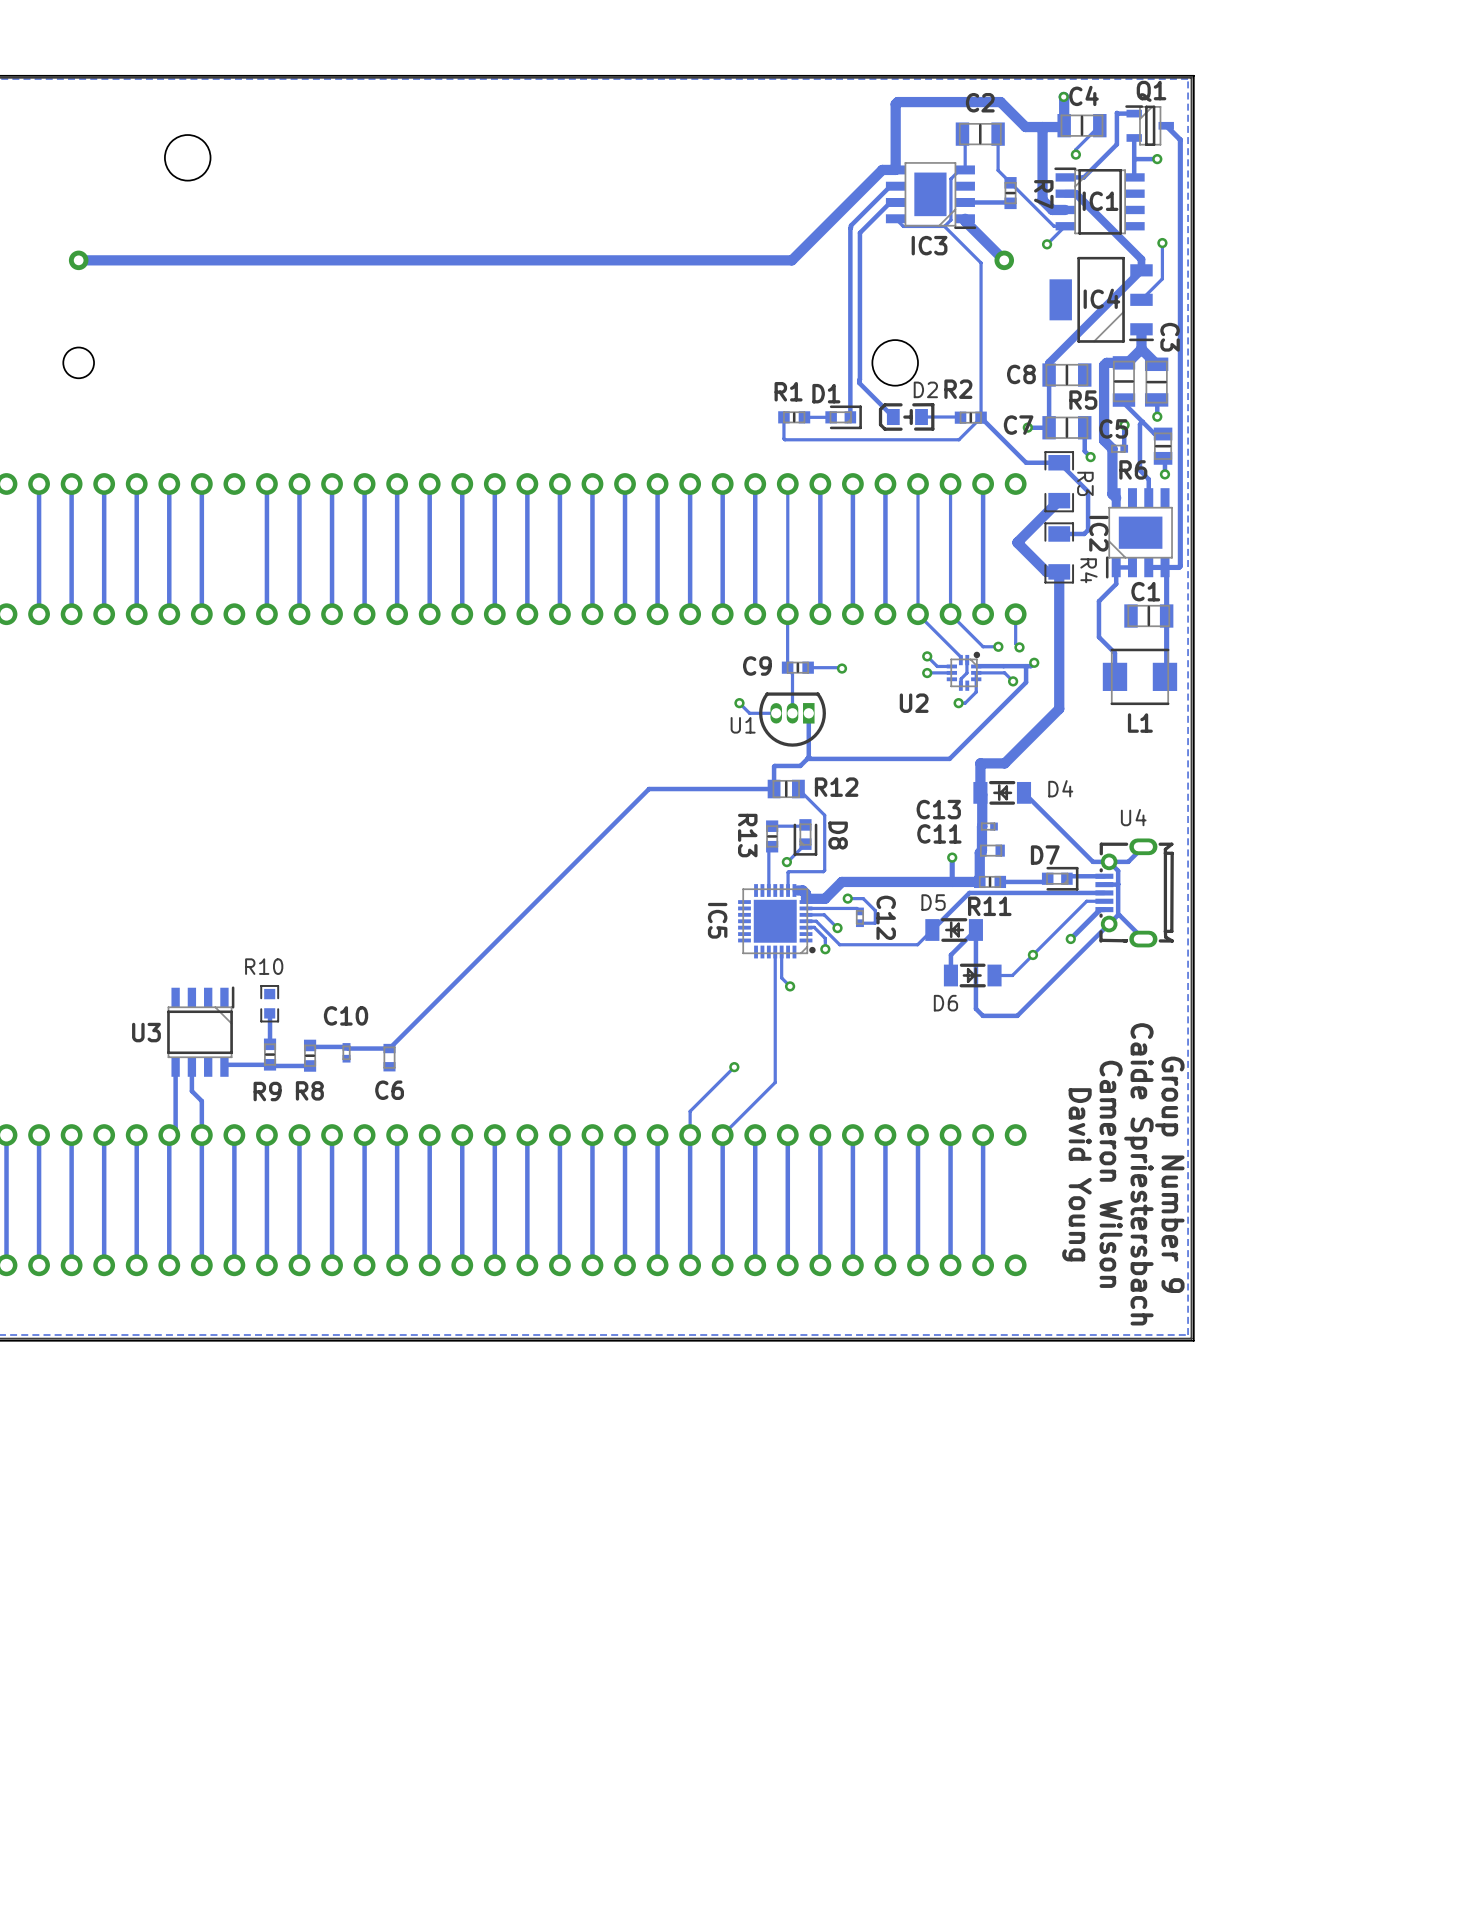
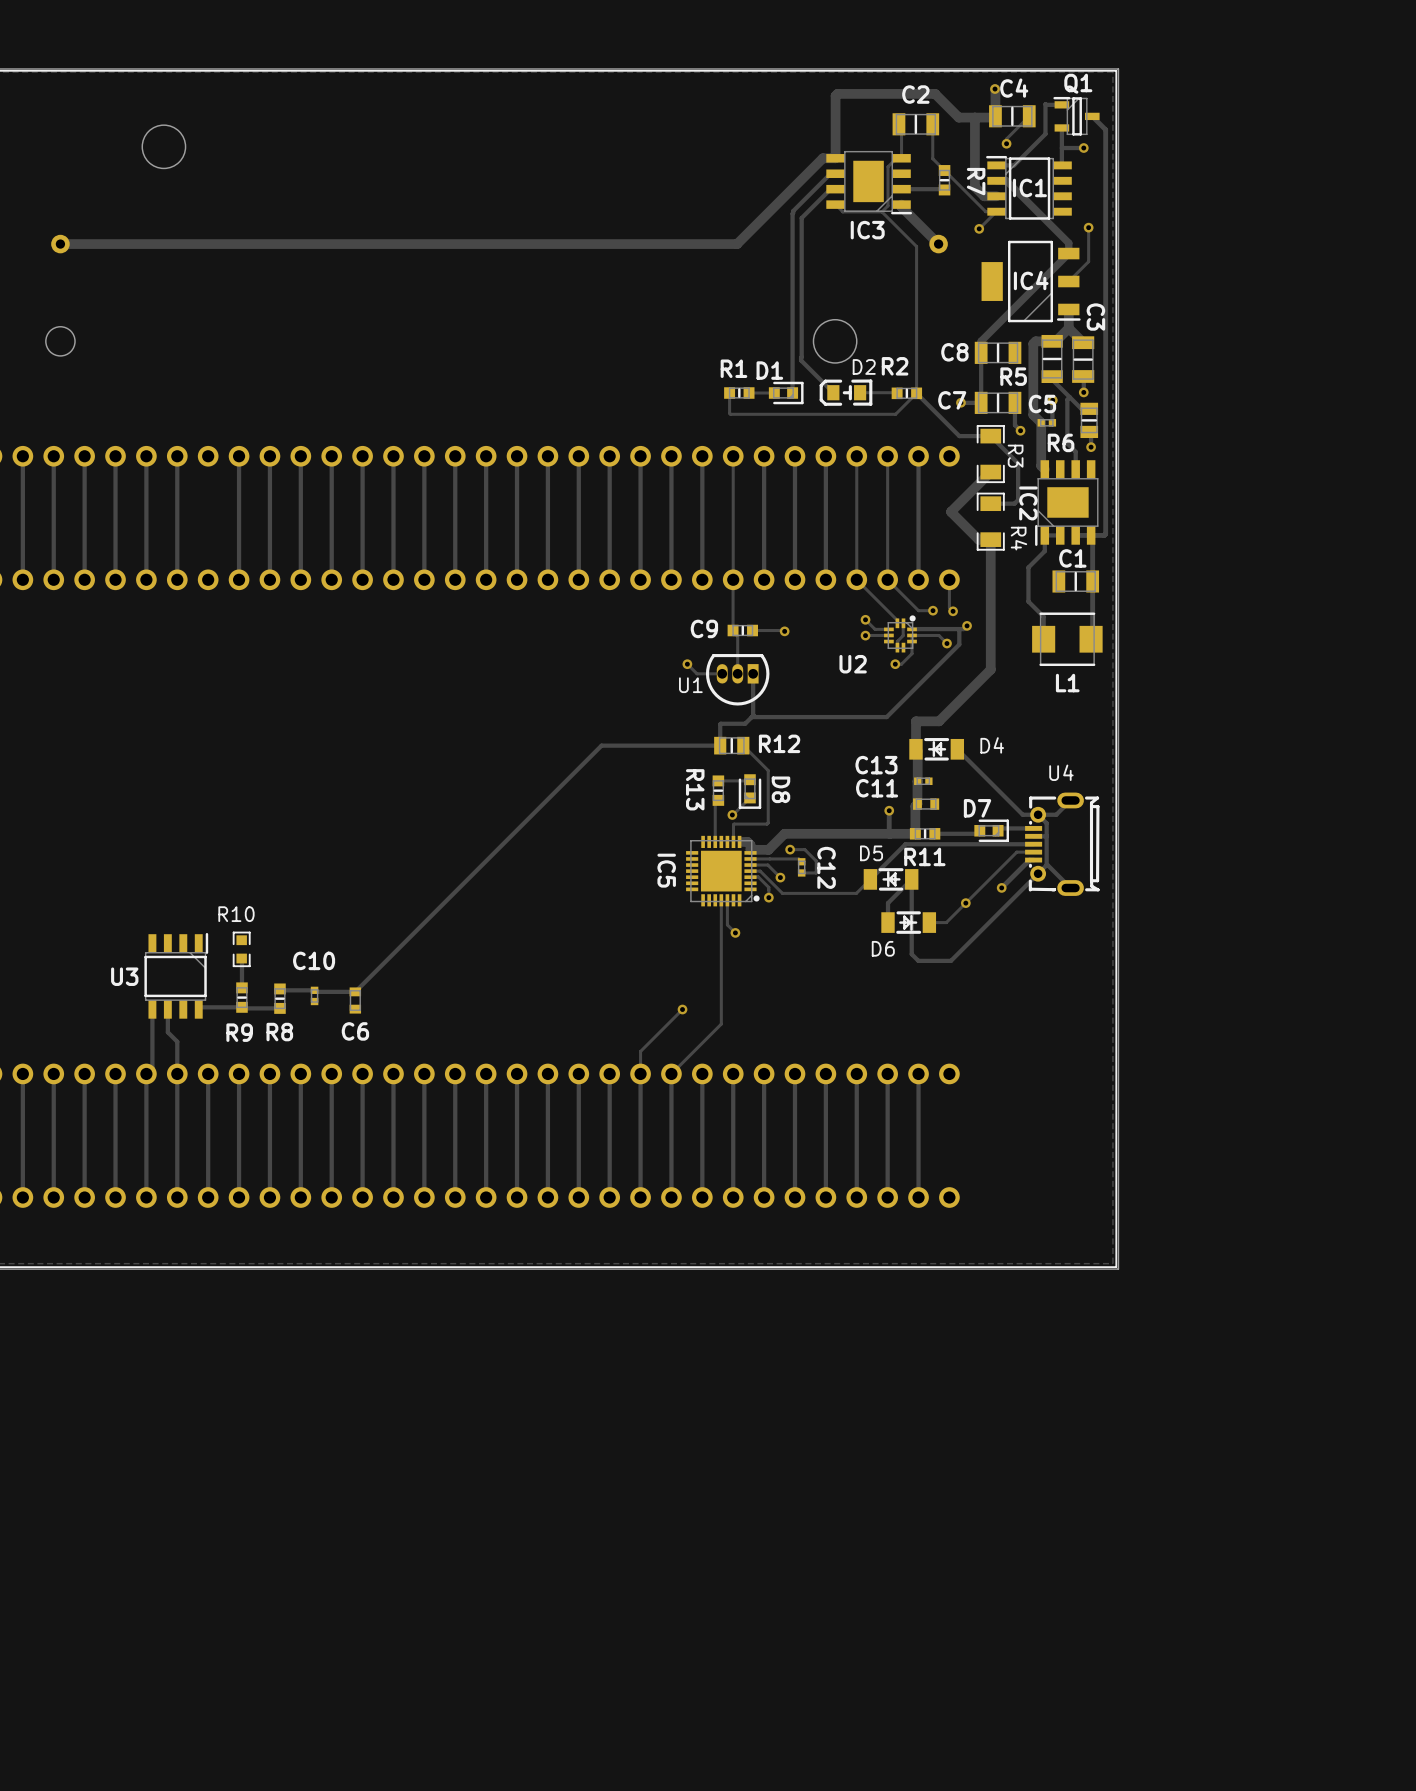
text: David Young (1076, 1174) -> none
text: Cameron Wilson (1111, 1174) -> none
text: Caide Spriestersbach (1138, 1174) -> none
text: Group Number 9 (1169, 1174) -> none

